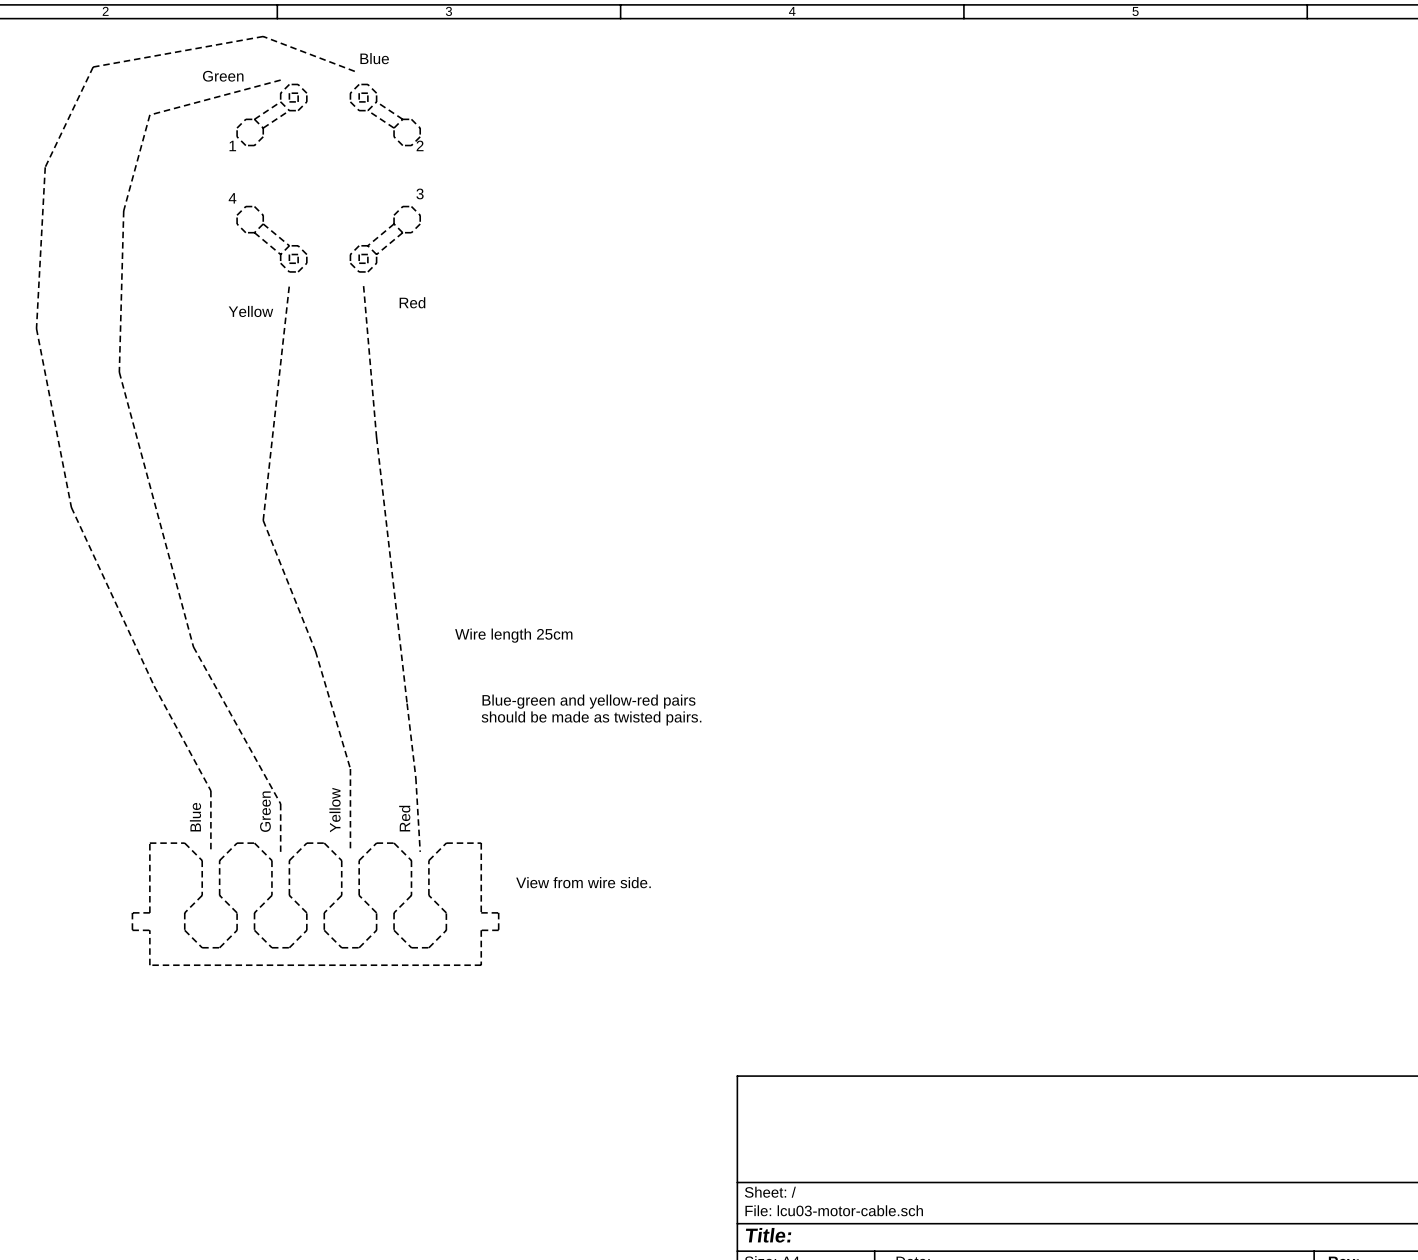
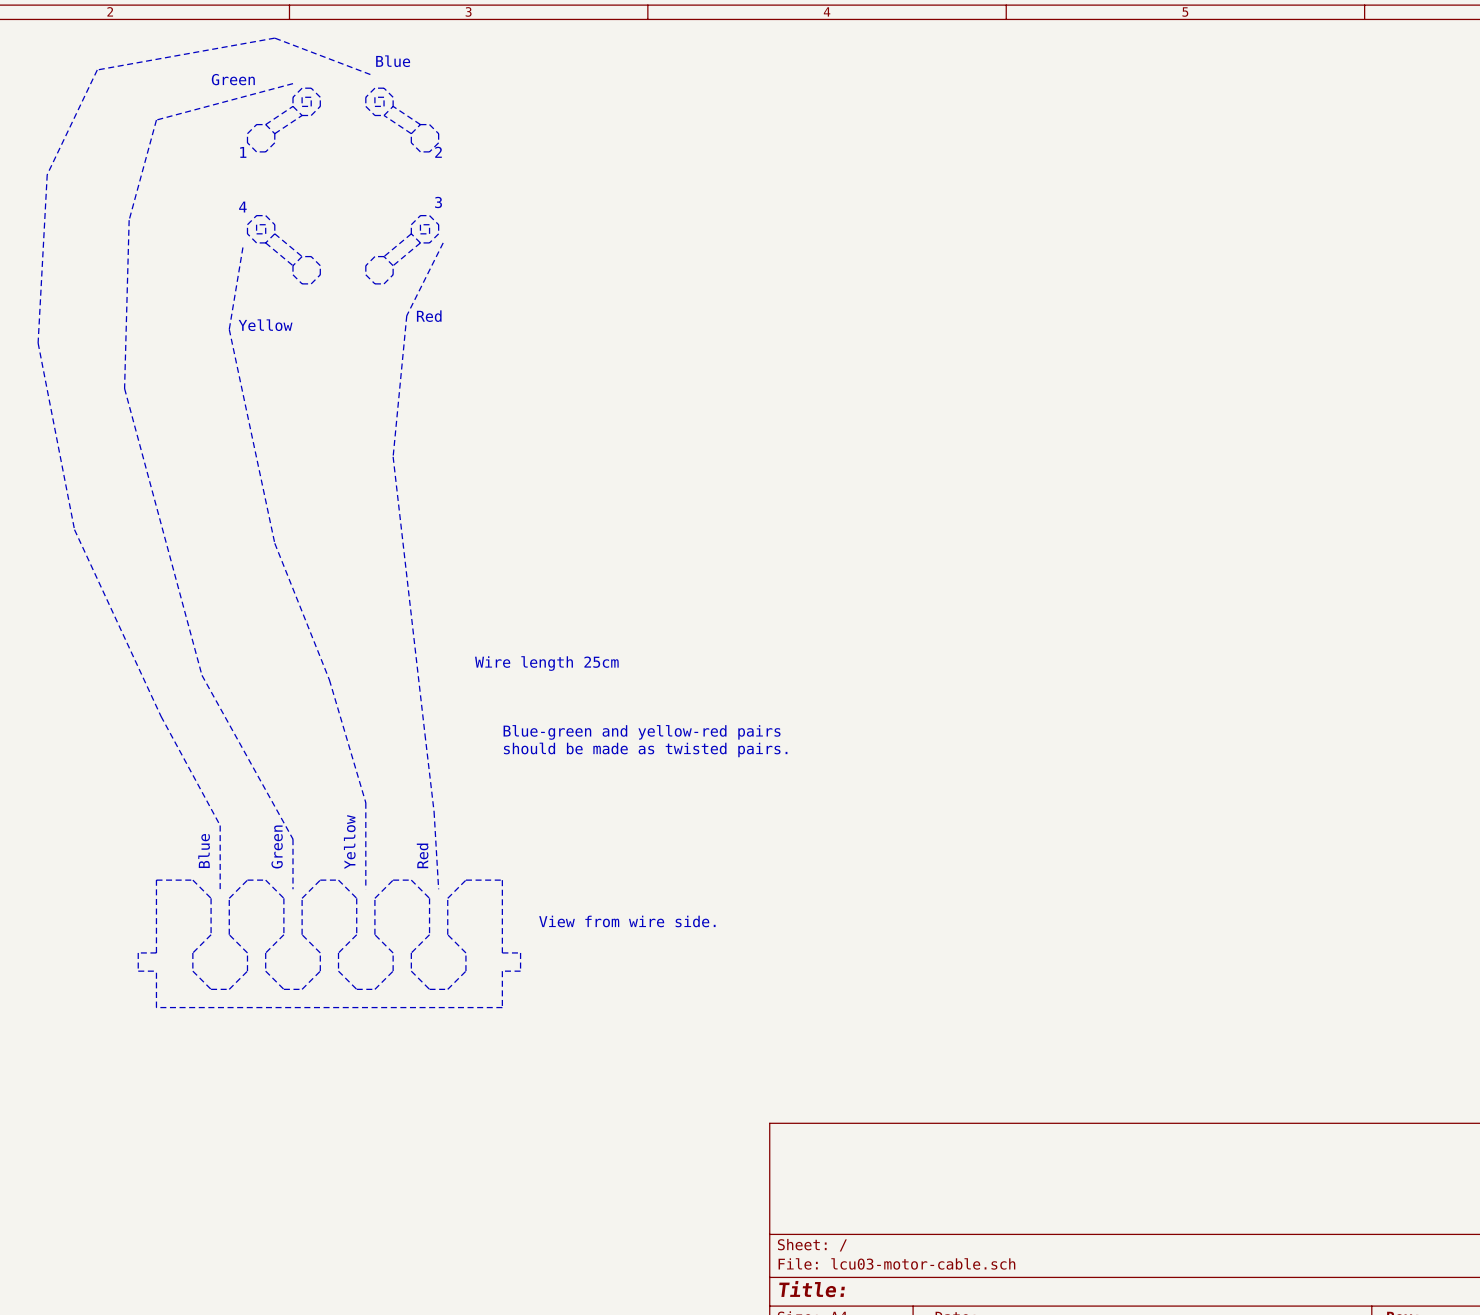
line: (289, 254) (289, 263) (298, 263) (298, 254) (289, 254) -> (256, 224) (256, 233) (265, 233) (265, 224) (256, 224)
line: (359, 254) (367, 254) (367, 263) (359, 263) (359, 254) -> (420, 224) (429, 224) (429, 233) (420, 233) (420, 224)
line: (289, 285) (263, 520) -> (242, 247) (229, 329) (274, 543)
line: (363, 285) (376, 437) -> (443, 242) (406, 315) (393, 456)

